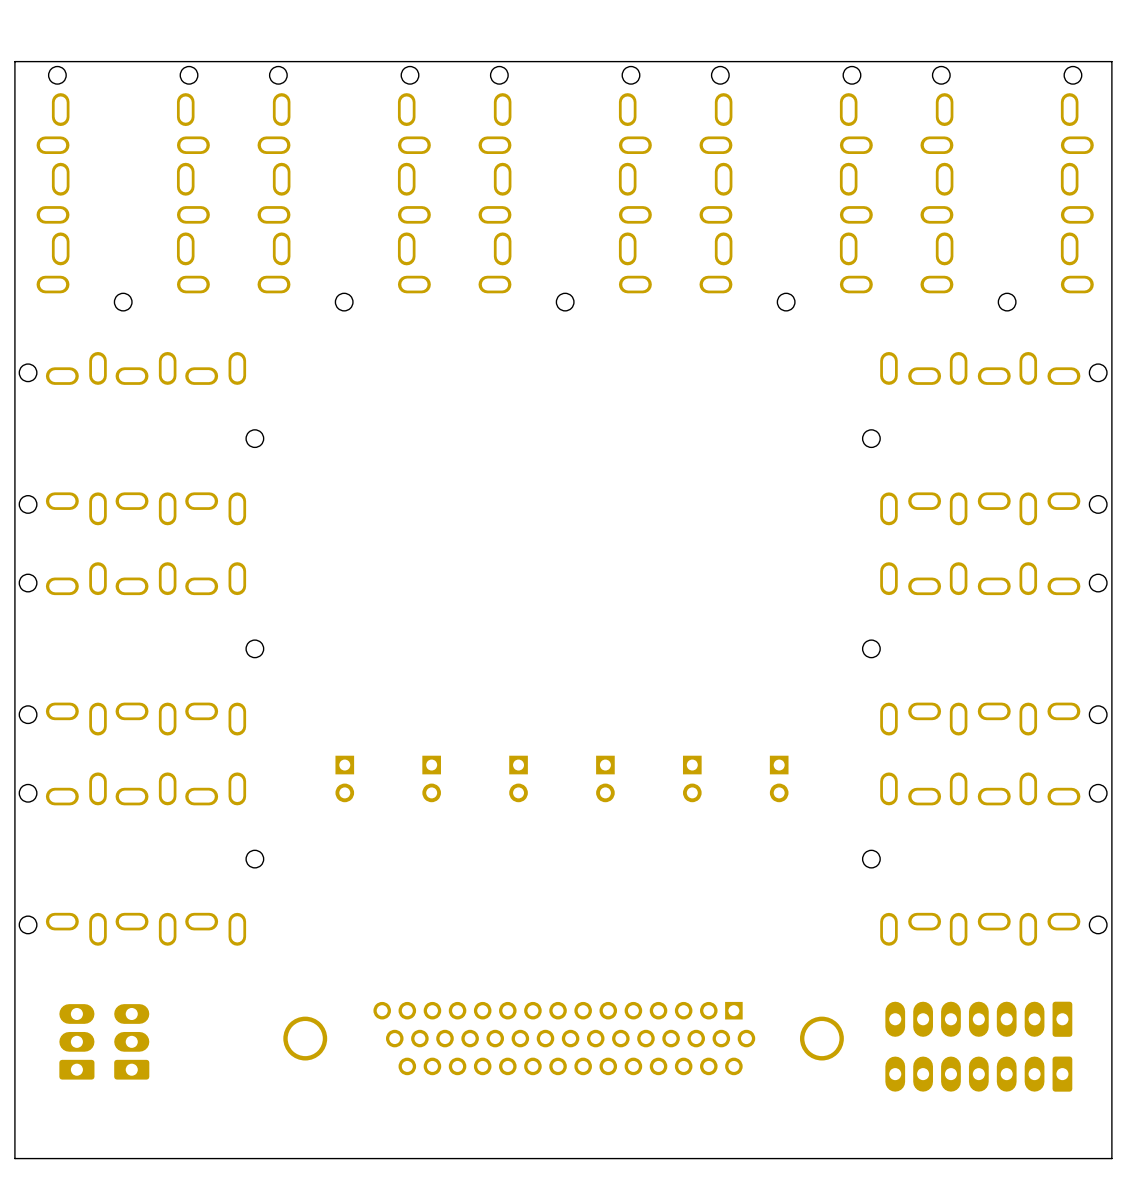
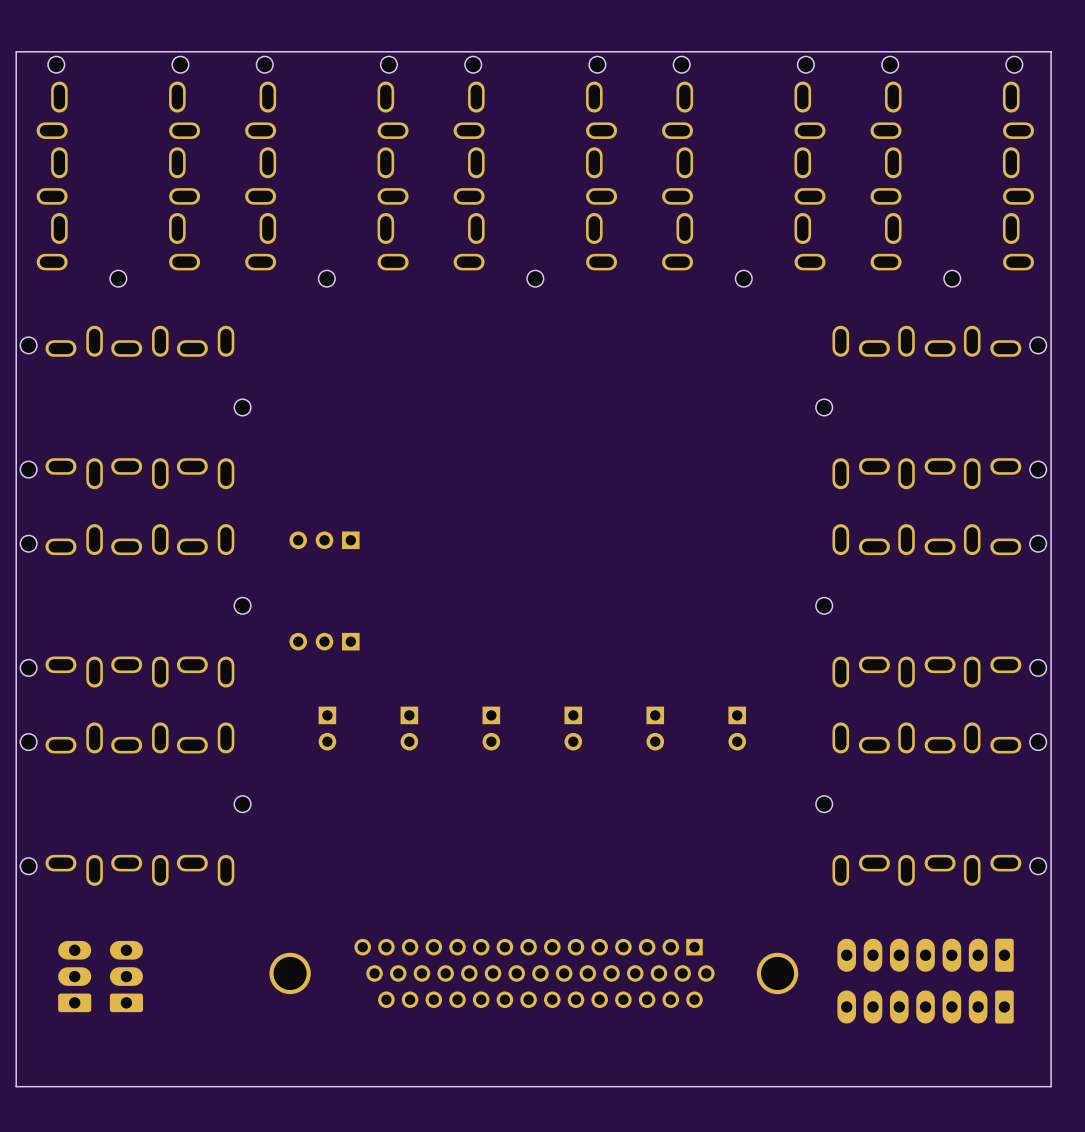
part: none -> (324, 540)
part: none -> (324, 641)

